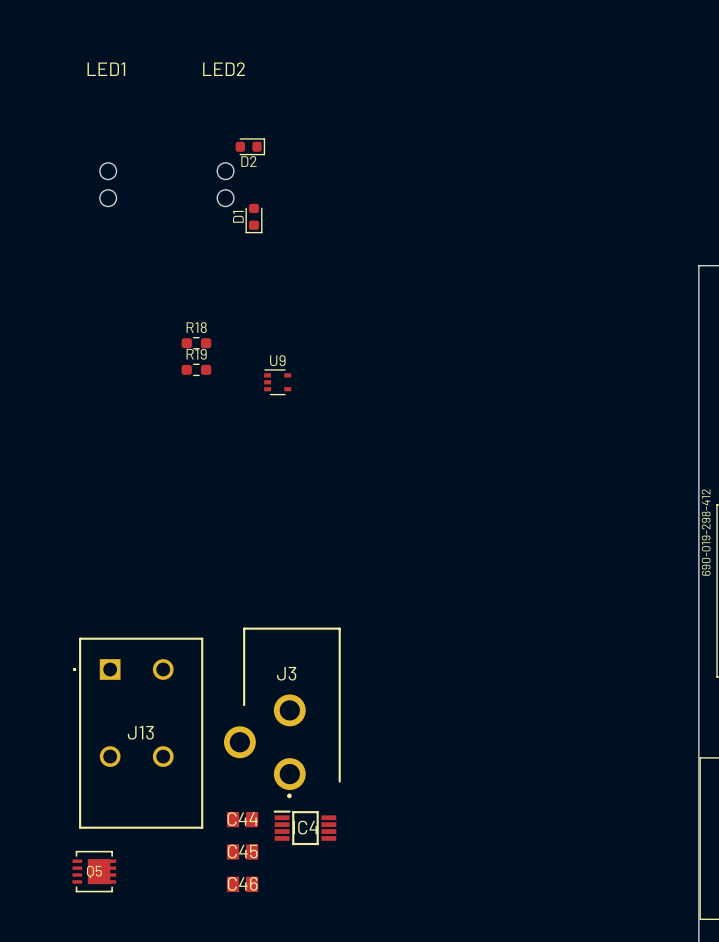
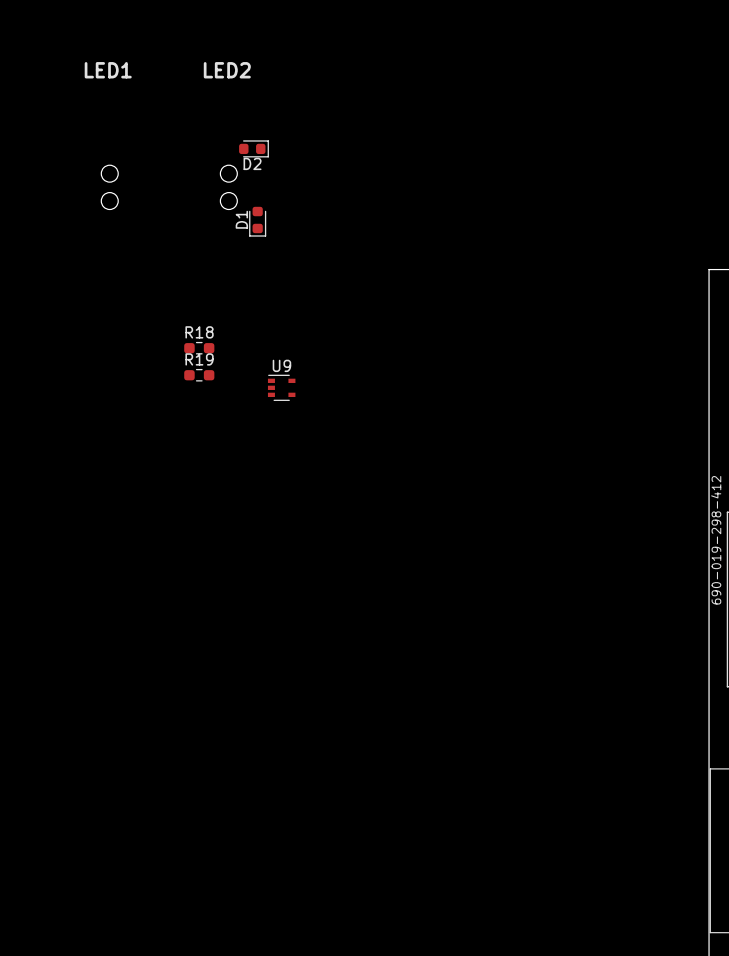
J3: (282, 712) -> none
J13: (138, 733) -> none
C44: (242, 819) -> none
IC4: (304, 827) -> none
C45: (242, 851) -> none
Q5: (94, 871) -> none
C46: (242, 884) -> none

